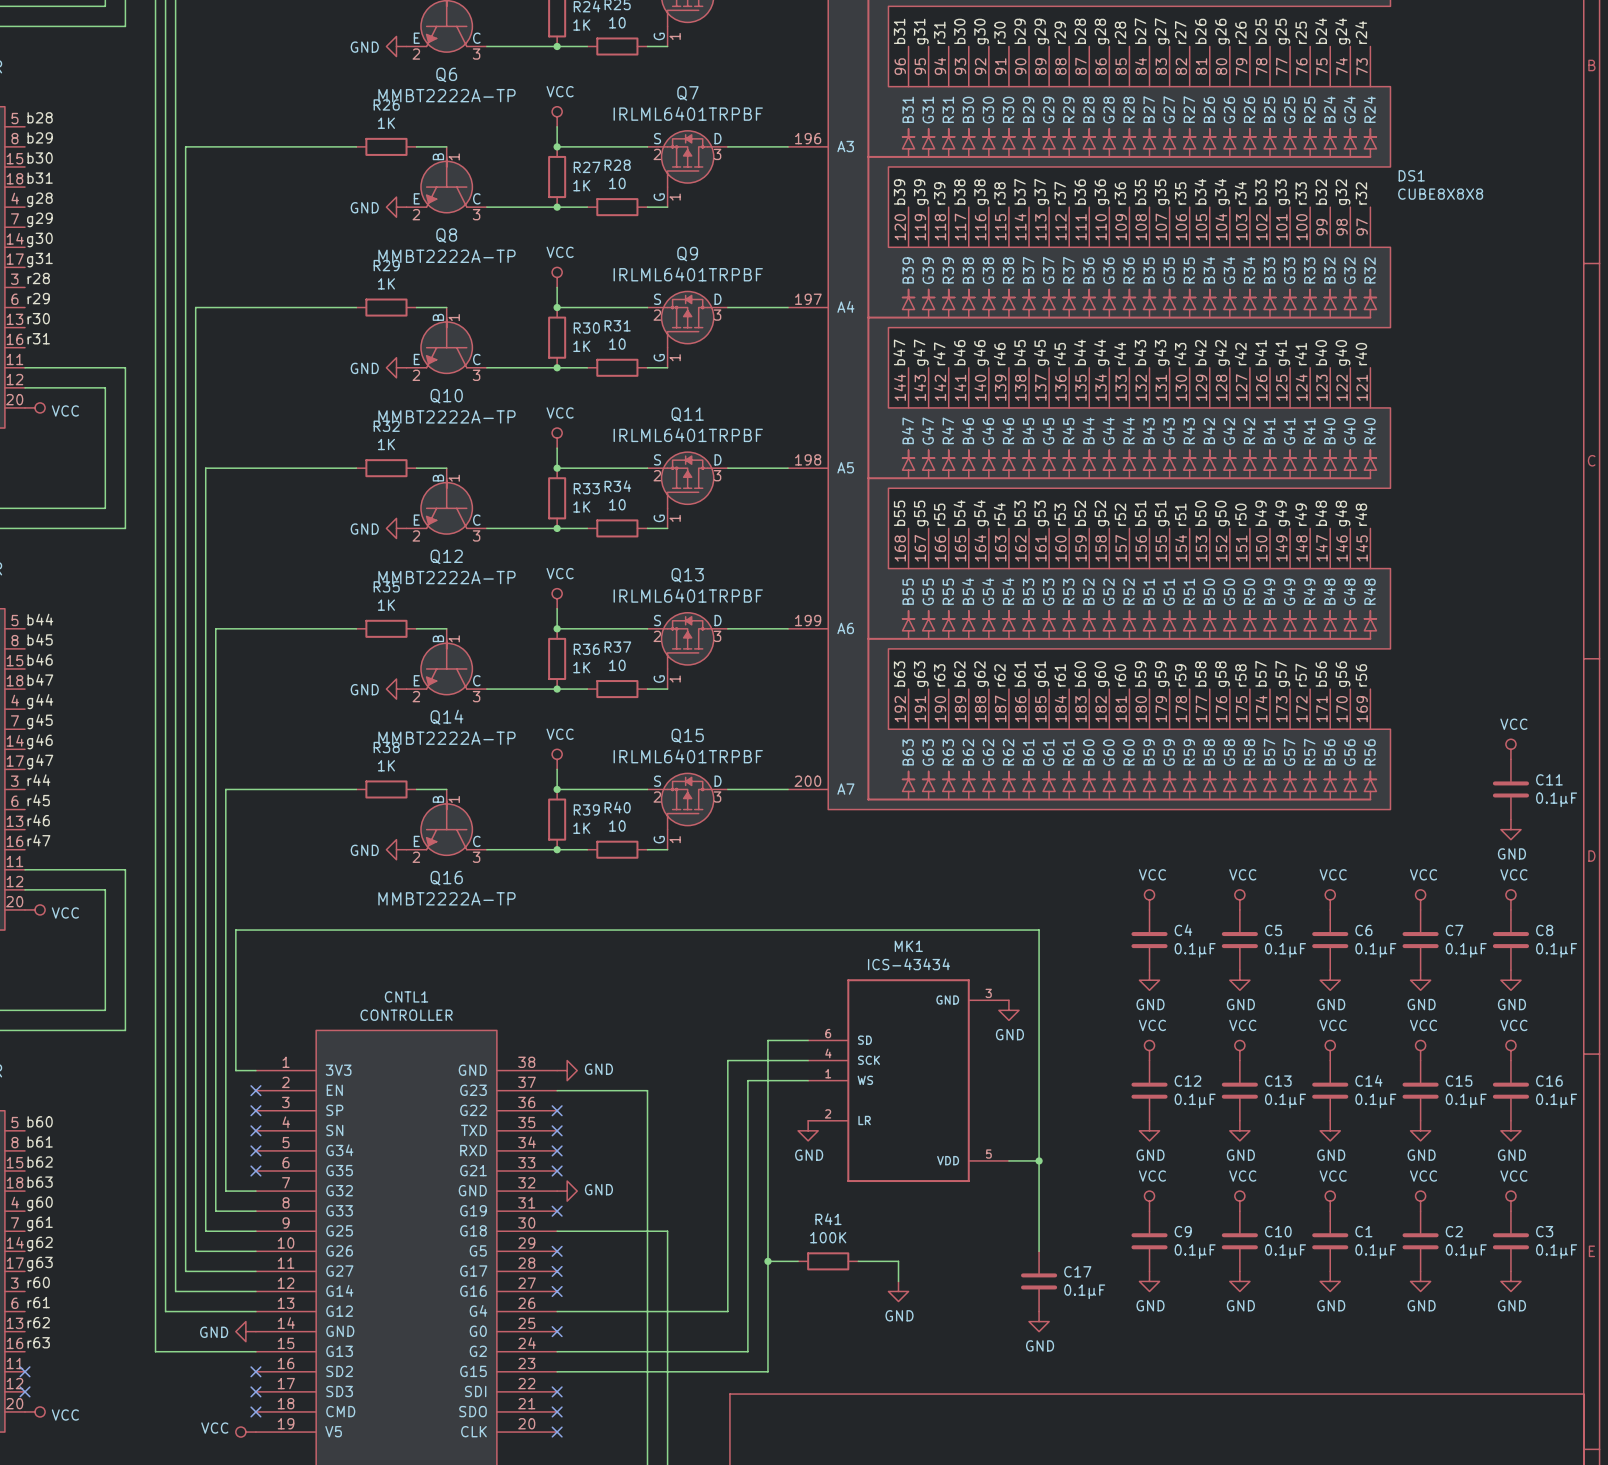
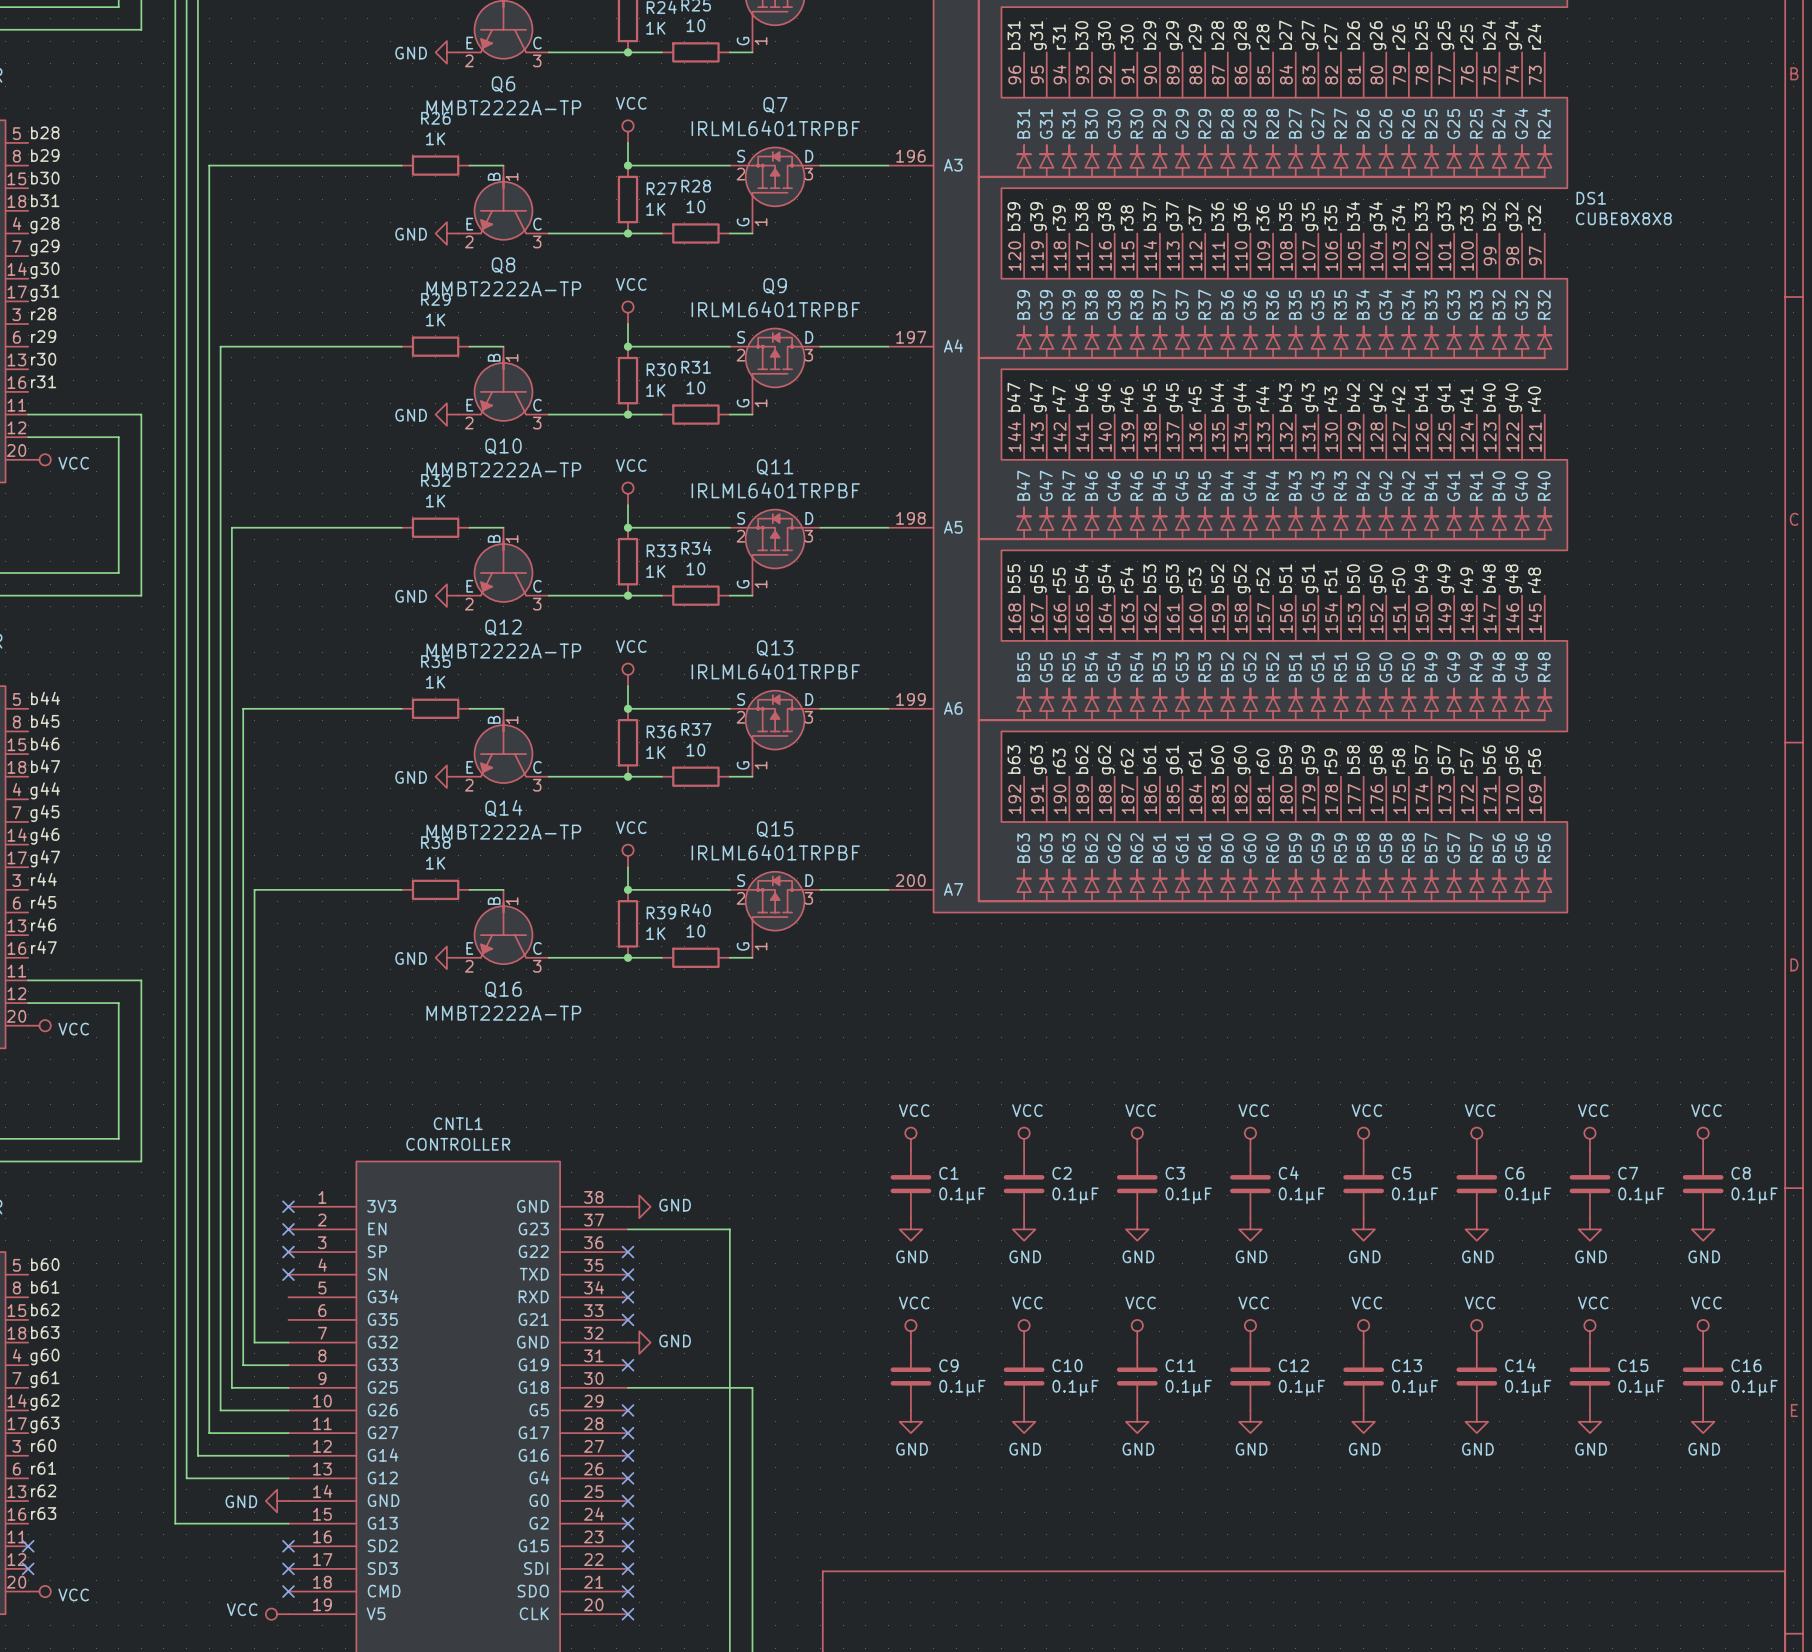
power symbol: VCC (1510, 749) -> none
C11 position: (1510, 789) -> (1137, 1376)
power symbol: GND (1510, 829) -> none
power symbol: VCC (1149, 899) -> none
power symbol: VCC (1239, 899) -> none
power symbol: VCC (1330, 899) -> none
power symbol: VCC (1420, 899) -> none
power symbol: VCC (1510, 899) -> none
C4 position: (1149, 940) -> (1250, 1184)
C5 position: (1239, 940) -> (1363, 1184)
C6 position: (1330, 940) -> (1476, 1184)
C7 position: (1420, 940) -> (1589, 1184)
C8 position: (1510, 940) -> (1703, 1184)
power symbol: GND (1149, 980) -> none
power symbol: GND (1239, 980) -> none
power symbol: GND (1330, 980) -> none
power symbol: GND (1420, 980) -> none
power symbol: GND (1510, 980) -> none
power symbol: none -> VCC (910, 1138)
power symbol: none -> VCC (1024, 1138)
power symbol: GND (1008, 1010) -> VCC (1137, 1138)
power symbol: none -> VCC (1250, 1138)
power symbol: none -> VCC (1363, 1138)
power symbol: none -> VCC (1476, 1138)
wire: (808, 1040) (767, 1040) (767, 1371) (557, 1371) -> none
power symbol: VCC (1149, 1050) -> none
power symbol: VCC (1239, 1050) -> none
power symbol: VCC (1330, 1050) -> none
power symbol position: VCC (1420, 1050) -> VCC (1589, 1138)
power symbol position: VCC (1510, 1050) -> VCC (1703, 1138)
wire: (808, 1060) (727, 1060) (727, 1311) (557, 1311) -> none
wire: (255, 1070) (235, 1070) (235, 930) (1039, 930) (1039, 1251) -> none
no-connect mark: none -> (288, 1206)
wire: (808, 1080) (747, 1080) (747, 1351) (557, 1351) -> none
MK1: ICS-43434 (908, 1080) -> none
power symbol: none -> GND (1024, 1229)
power symbol: none -> GND (1137, 1229)
power symbol: none -> GND (1250, 1229)
C12 position: (1149, 1090) -> (1250, 1376)
power symbol: none -> GND (1363, 1229)
C13 position: (1239, 1090) -> (1363, 1376)
power symbol: none -> GND (1476, 1229)
C14 position: (1330, 1090) -> (1476, 1376)
C15 position: (1420, 1090) -> (1589, 1376)
C16 position: (1510, 1090) -> (1703, 1376)
power symbol position: GND (808, 1130) -> GND (910, 1229)
power symbol: GND (1149, 1130) -> none
power symbol: GND (1239, 1130) -> none
power symbol: GND (1330, 1130) -> none
power symbol position: GND (1420, 1130) -> GND (1589, 1229)
power symbol position: GND (1510, 1130) -> GND (1703, 1229)
no-connect mark: (255, 1150) -> none
wire: (1008, 1160) (1039, 1160) -> none
junction: (1039, 1160) -> none
no-connect mark: (255, 1170) -> none
power symbol: none -> VCC (910, 1331)
power symbol: none -> VCC (1024, 1331)
power symbol: none -> VCC (1137, 1331)
power symbol: none -> VCC (1250, 1331)
power symbol: none -> VCC (1363, 1331)
power symbol: VCC (1149, 1201) -> none
power symbol: VCC (1239, 1201) -> none
power symbol position: VCC (1330, 1201) -> VCC (1476, 1331)
power symbol position: VCC (1420, 1201) -> VCC (1589, 1331)
power symbol position: VCC (1510, 1201) -> VCC (1703, 1331)
C9 position: (1149, 1241) -> (910, 1376)
C10 position: (1239, 1241) -> (1024, 1376)
C1 position: (1330, 1241) -> (910, 1184)
C2 position: (1420, 1241) -> (1024, 1184)
C3 position: (1510, 1241) -> (1137, 1184)
wire: (767, 1261) (798, 1261) -> none
junction: (767, 1261) -> none
power symbol: none -> GND (910, 1421)
R41: 100K (828, 1261) -> none
wire: (858, 1261) (898, 1261) (898, 1281) -> none
power symbol: none -> GND (1137, 1421)
power symbol: none -> GND (1250, 1421)
power symbol: none -> GND (1363, 1421)
C17: 0.1µF (1039, 1281) -> none
power symbol: GND (1149, 1281) -> none
power symbol: GND (1239, 1281) -> none
power symbol position: GND (1330, 1281) -> GND (1476, 1421)
power symbol position: GND (1420, 1281) -> GND (1589, 1421)
power symbol position: GND (1510, 1281) -> GND (1703, 1421)
power symbol position: GND (898, 1291) -> GND (1024, 1421)
no-connect mark: none -> (628, 1478)
power symbol: GND (1039, 1321) -> none
no-connect mark: none -> (628, 1523)
no-connect mark: none -> (628, 1546)

